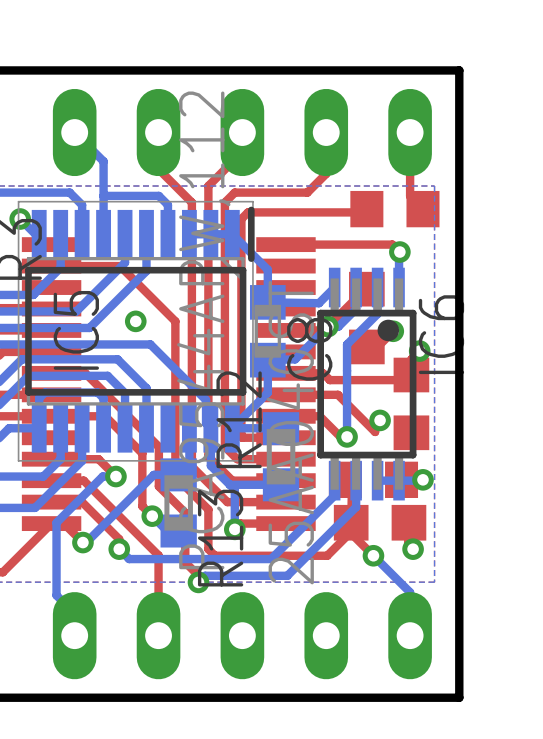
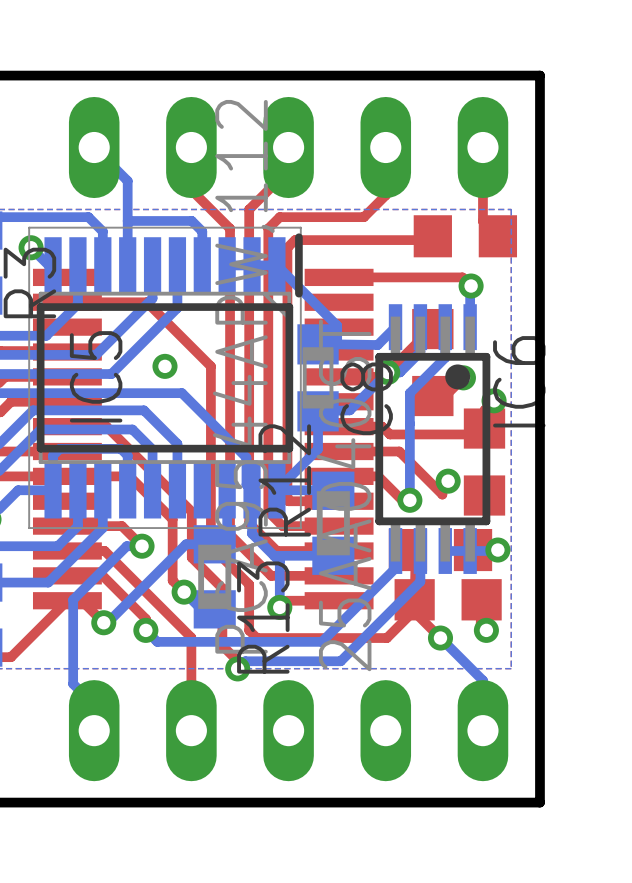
bottom track: (267, 269) (267, 302) (318, 303) -> (318, 306) (337, 325) (337, 344) (377, 345)

